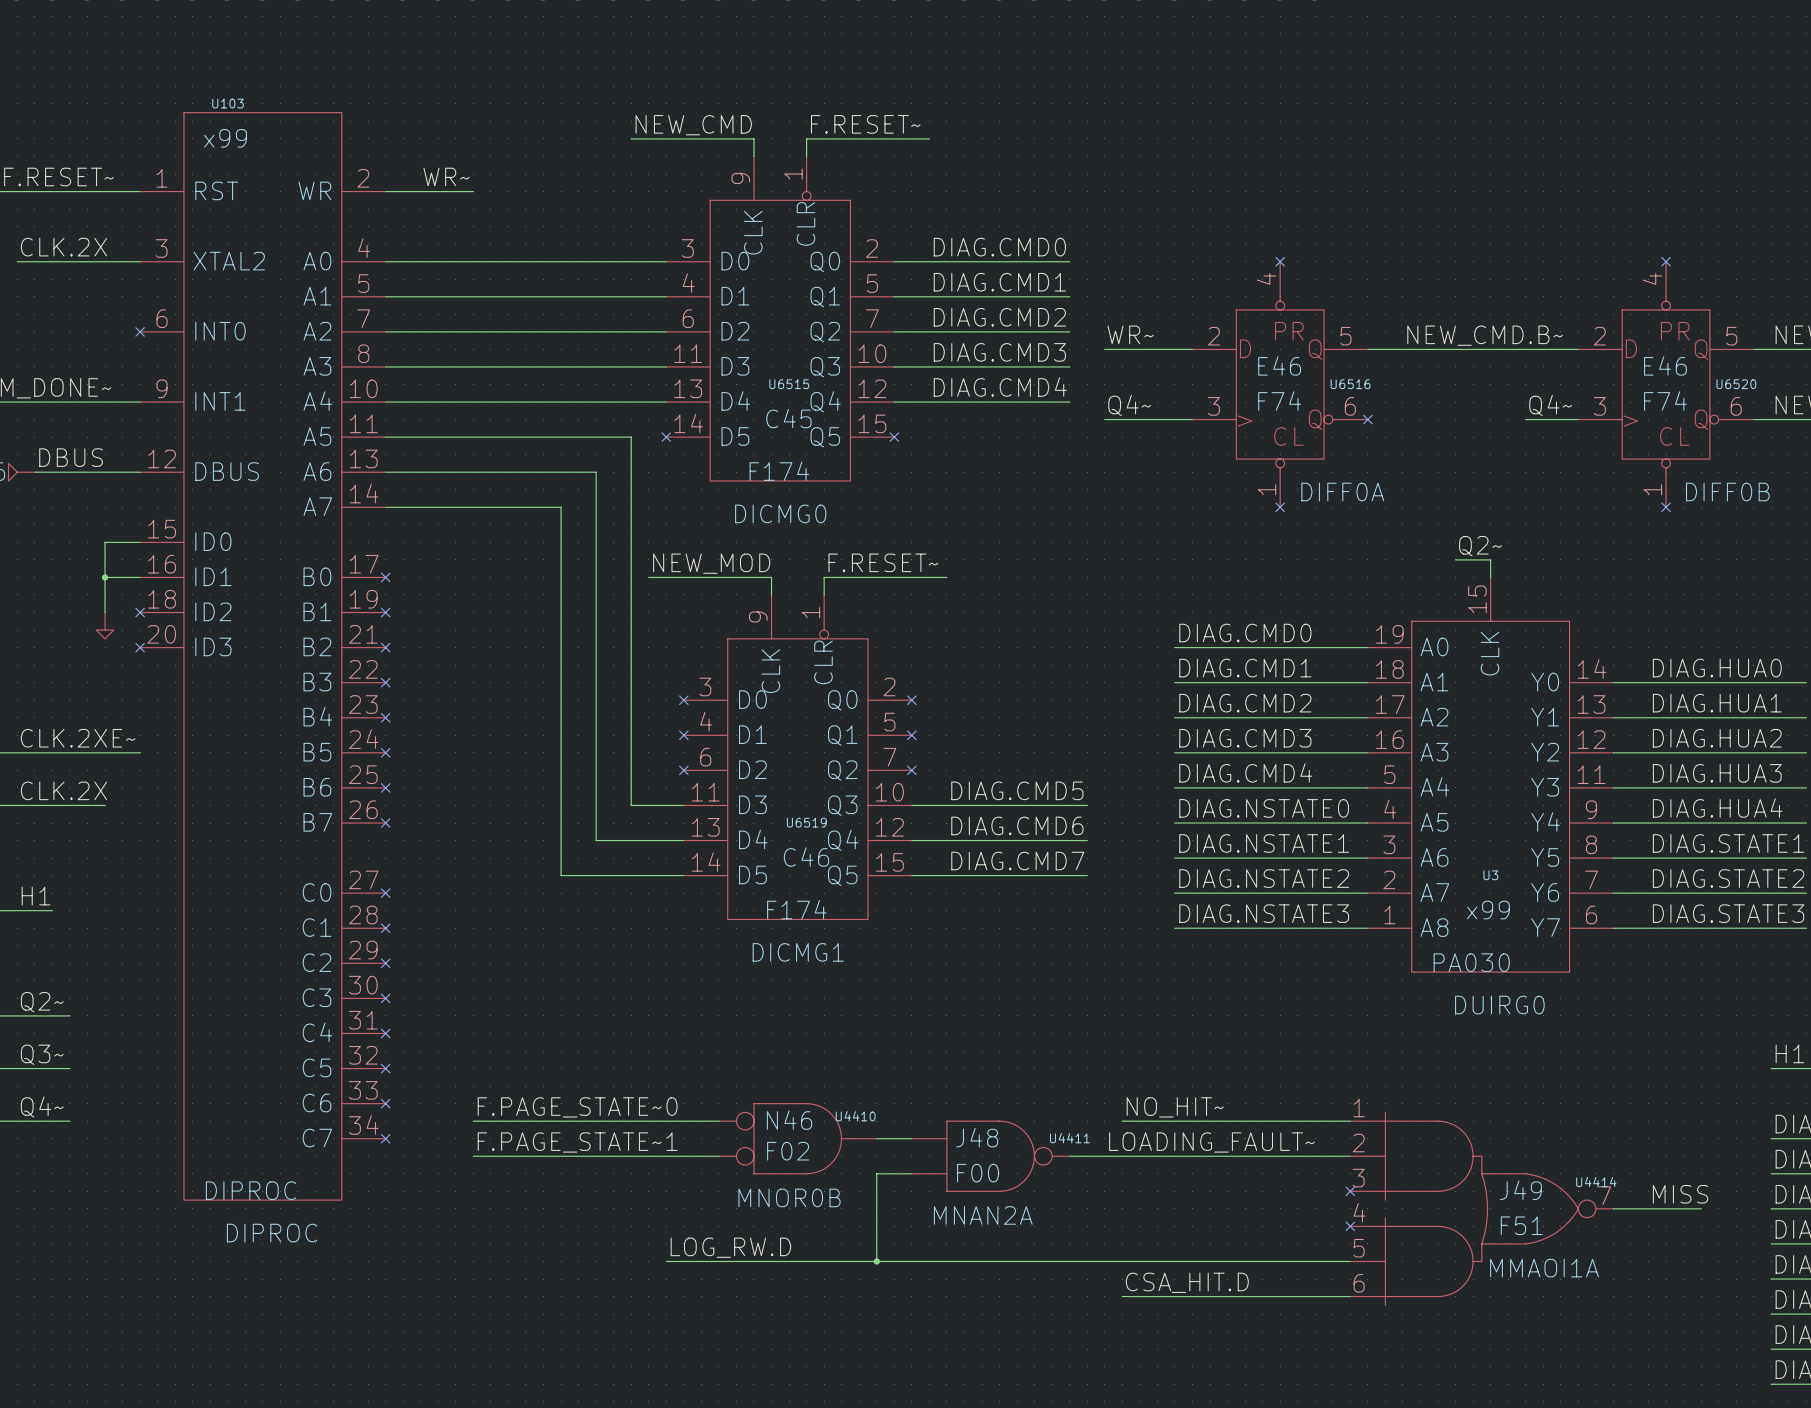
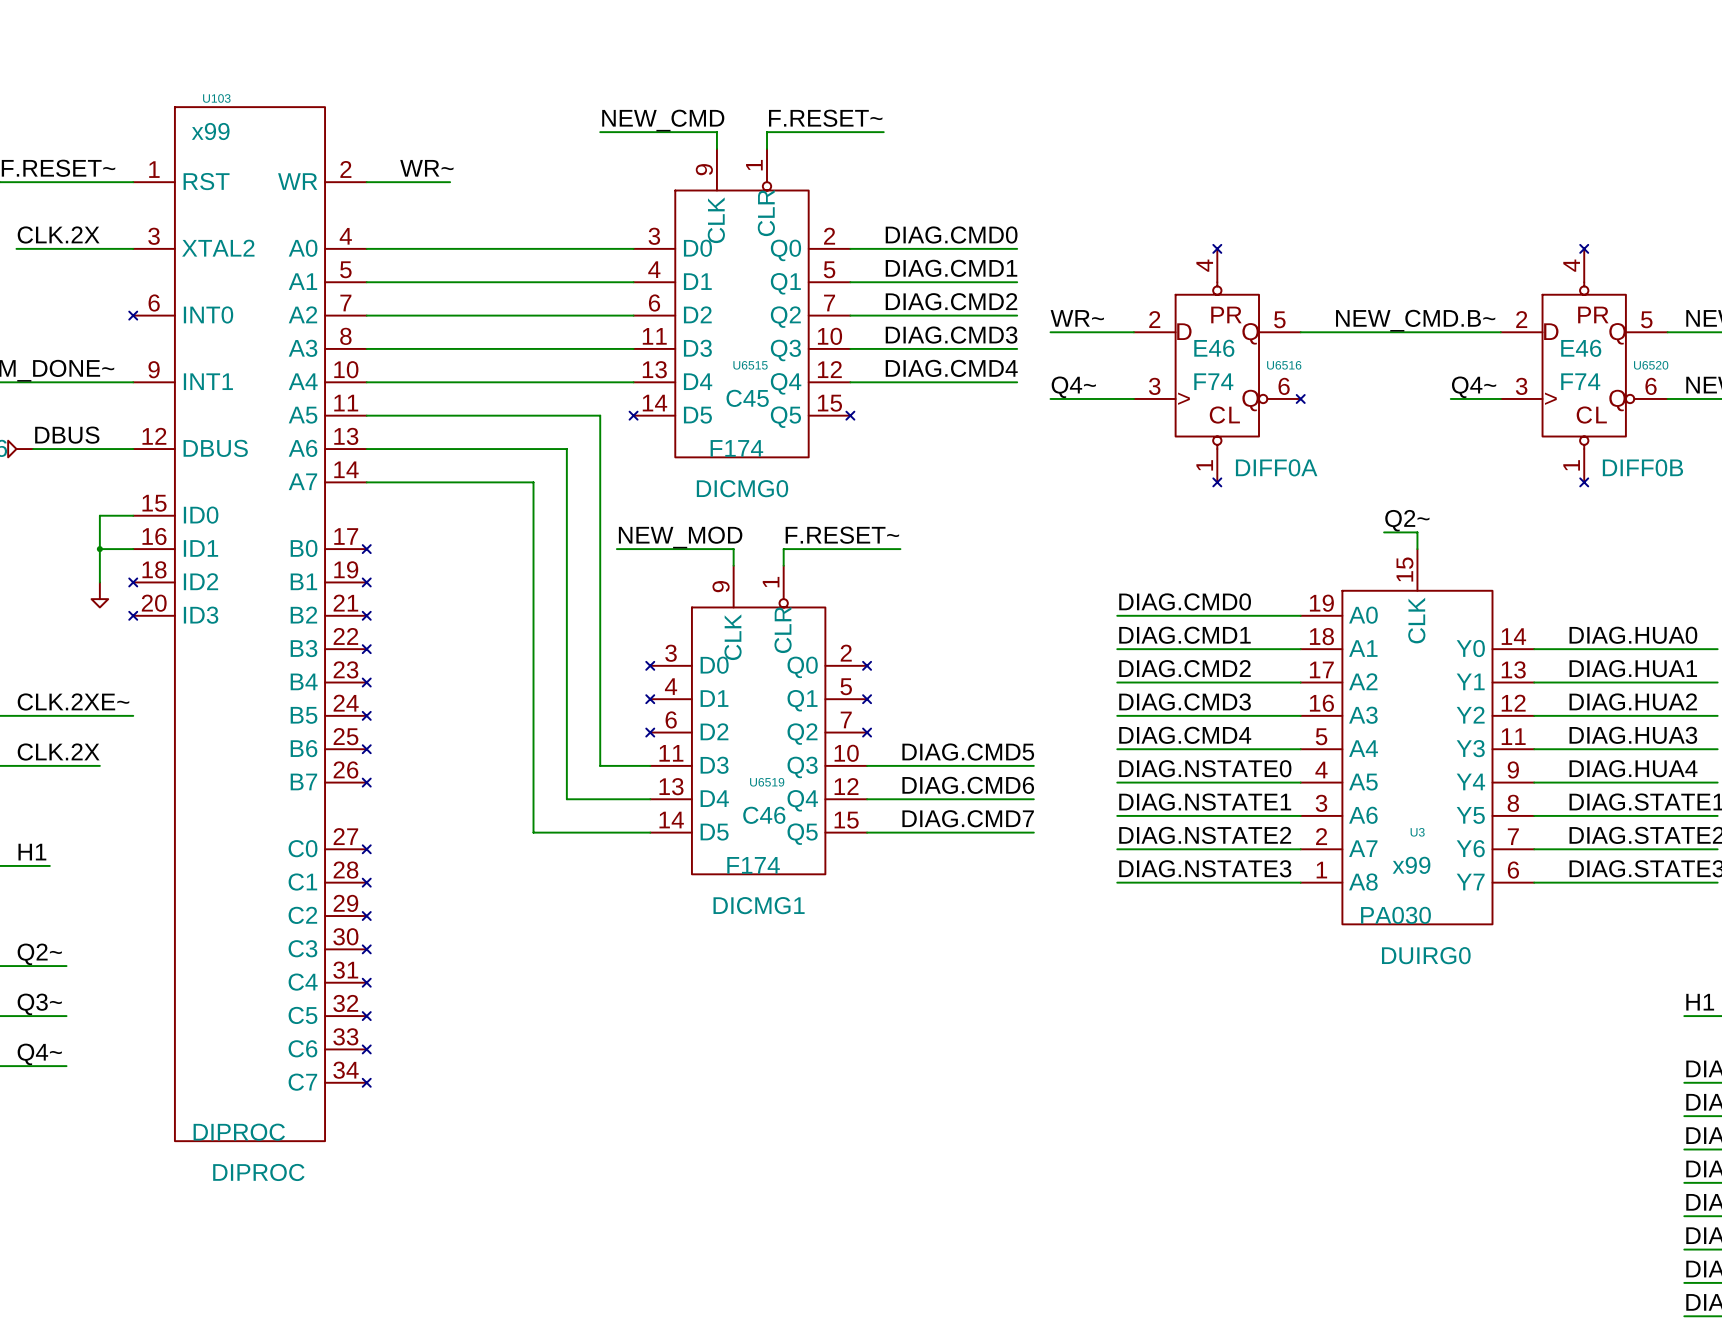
label: F.PAGE_STATE~0 (577, 1107) -> none
label: NO_HIT~ (1175, 1107) -> none
wire: (473, 1121) (718, 1121) -> none
wire: (1122, 1121) (1350, 1121) -> none
U4410: F02 (797, 1138) -> none
wire: (876, 1138) (911, 1138) -> none
label: F.PAGE_STATE~1 (577, 1142) -> none
label: LOADING_FAULT~ (1211, 1142) -> none
wire: (473, 1156) (718, 1156) -> none
U4411: F00 (990, 1156) -> none
wire: (1069, 1156) (1350, 1156) -> none
wire: (911, 1173) (876, 1173) (876, 1261) -> none
no-connect mark: (1350, 1191) -> none
label: MISS (1680, 1194) -> none
U4414: F51 (1481, 1208) -> none
wire: (1613, 1208) (1701, 1208) -> none
no-connect mark: (1350, 1226) -> none
label: LOG_RW.D (730, 1247) -> none
wire: (666, 1261) (1350, 1261) -> none
junction: (876, 1261) -> none
label: CSA_HIT.D (1187, 1282) -> none
wire: (1122, 1296) (1350, 1296) -> none

